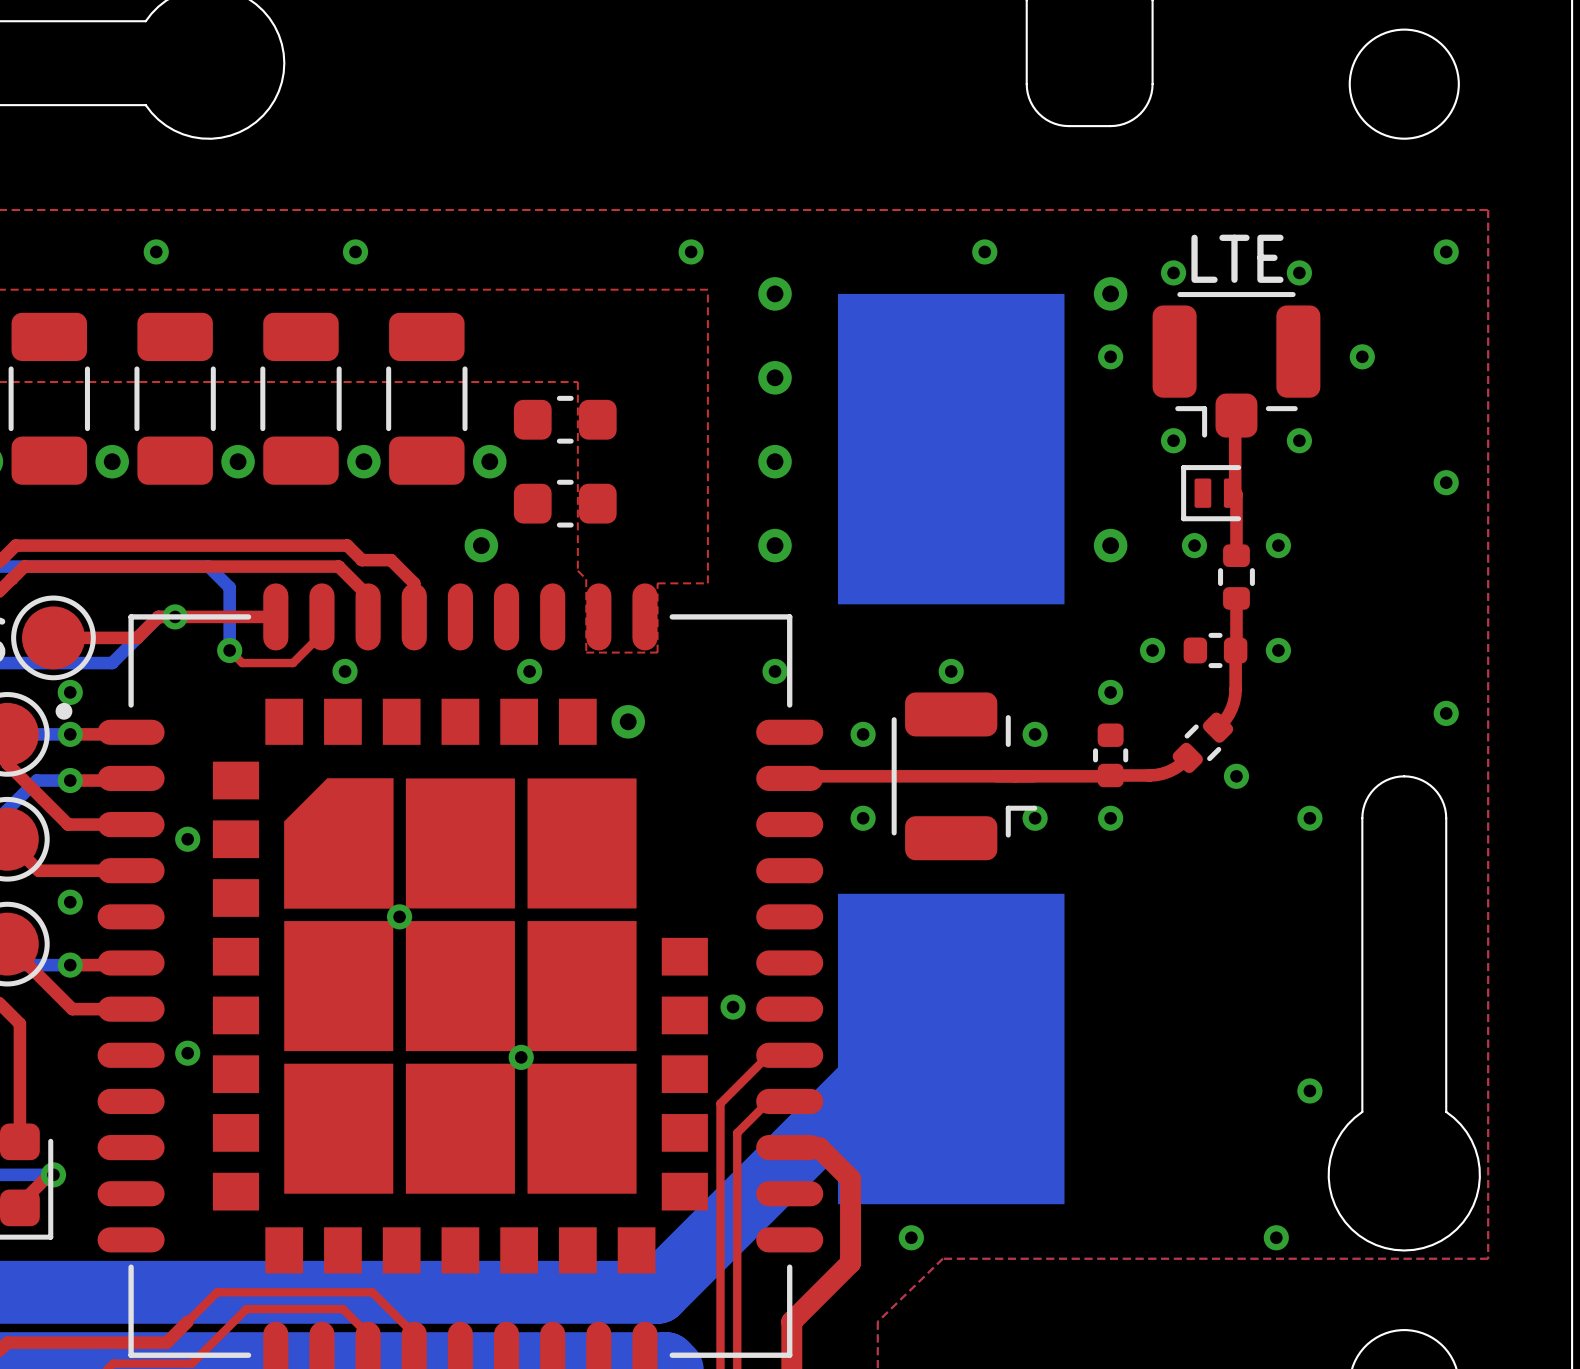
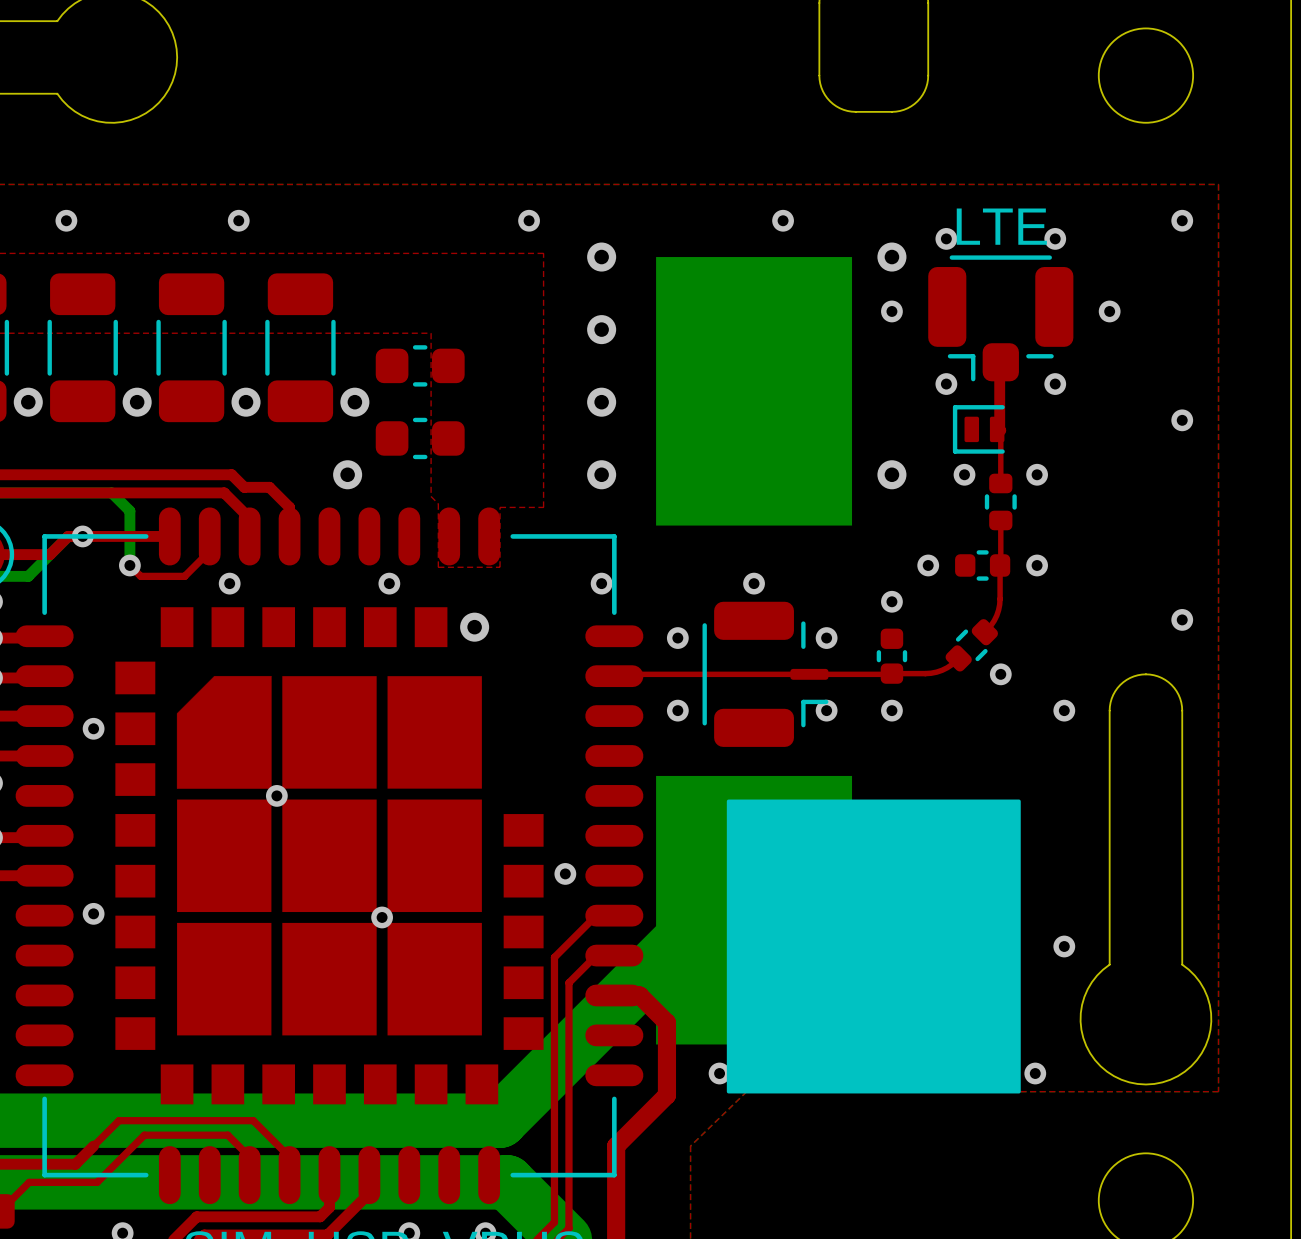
top track width: thick (1236, 494) (1236, 555) -> thin (1000, 430) (1000, 483)
top track width: thick (1236, 598) (1235, 695) (1228, 714) (1218, 727) -> thin (1000, 520) (999, 604) (994, 620) (984, 632)
top track width: thick (1187, 757) (1168, 771) (1149, 775) (791, 776) (789, 778) -> thin (958, 658) (942, 670) (925, 673) (616, 674) (614, 676)
drawing: none -> [726, 799, 1021, 1094]

